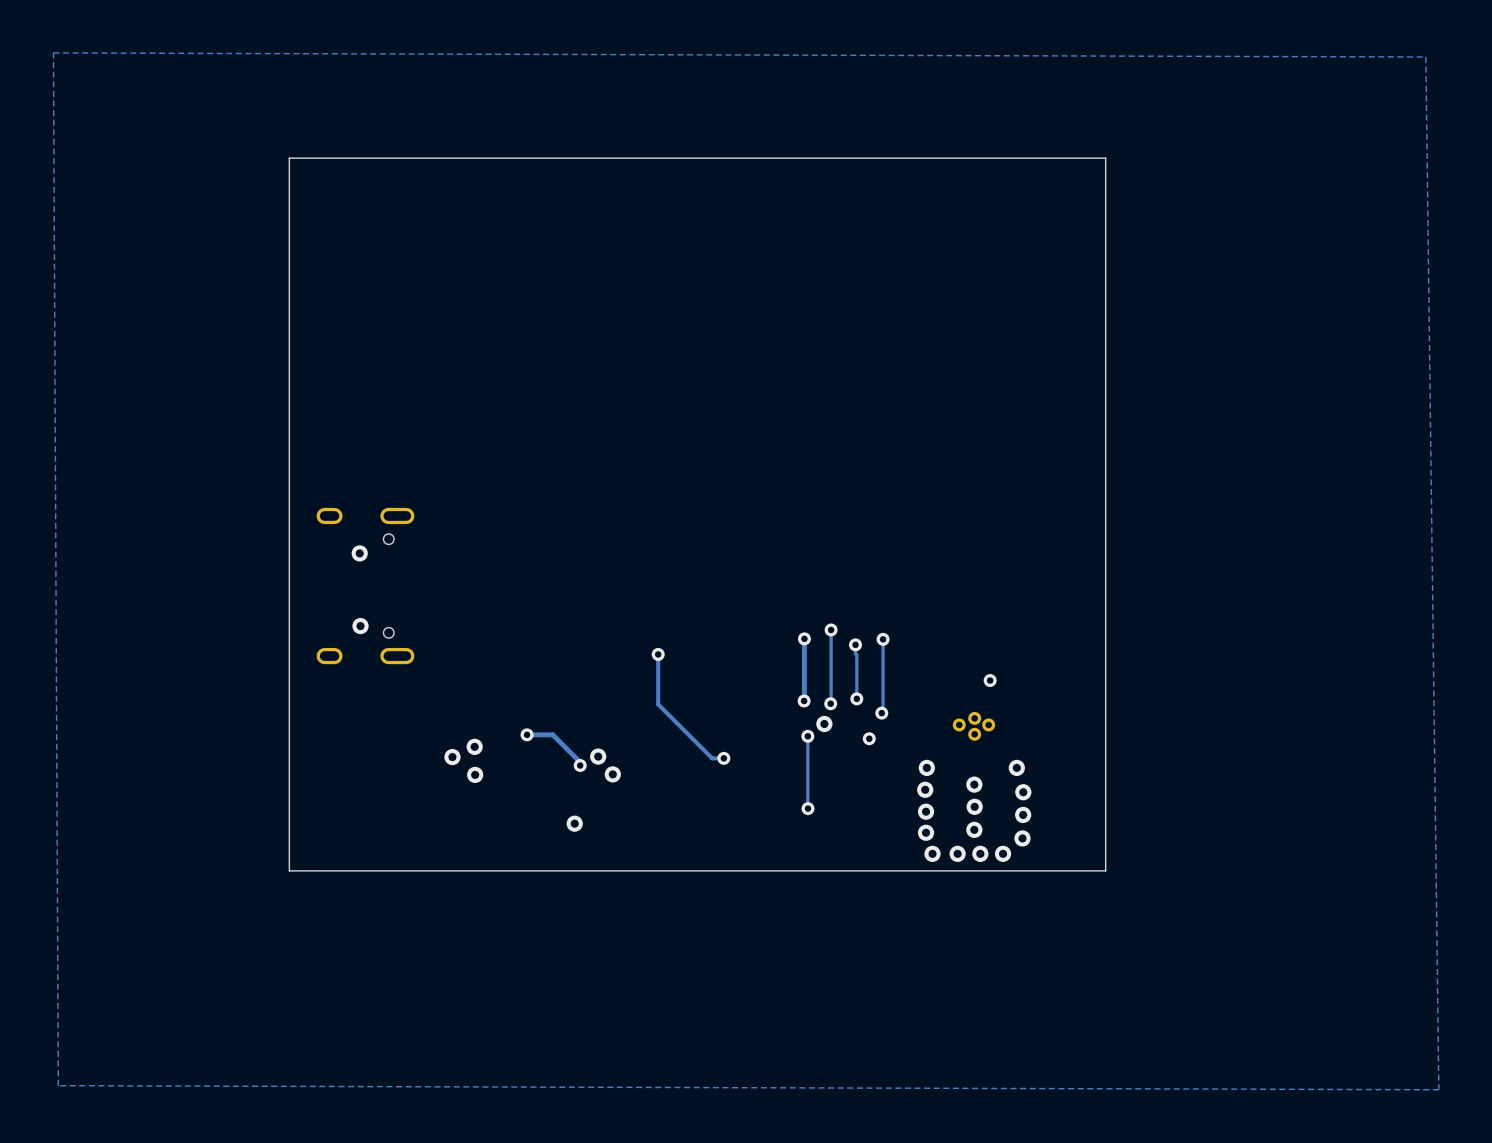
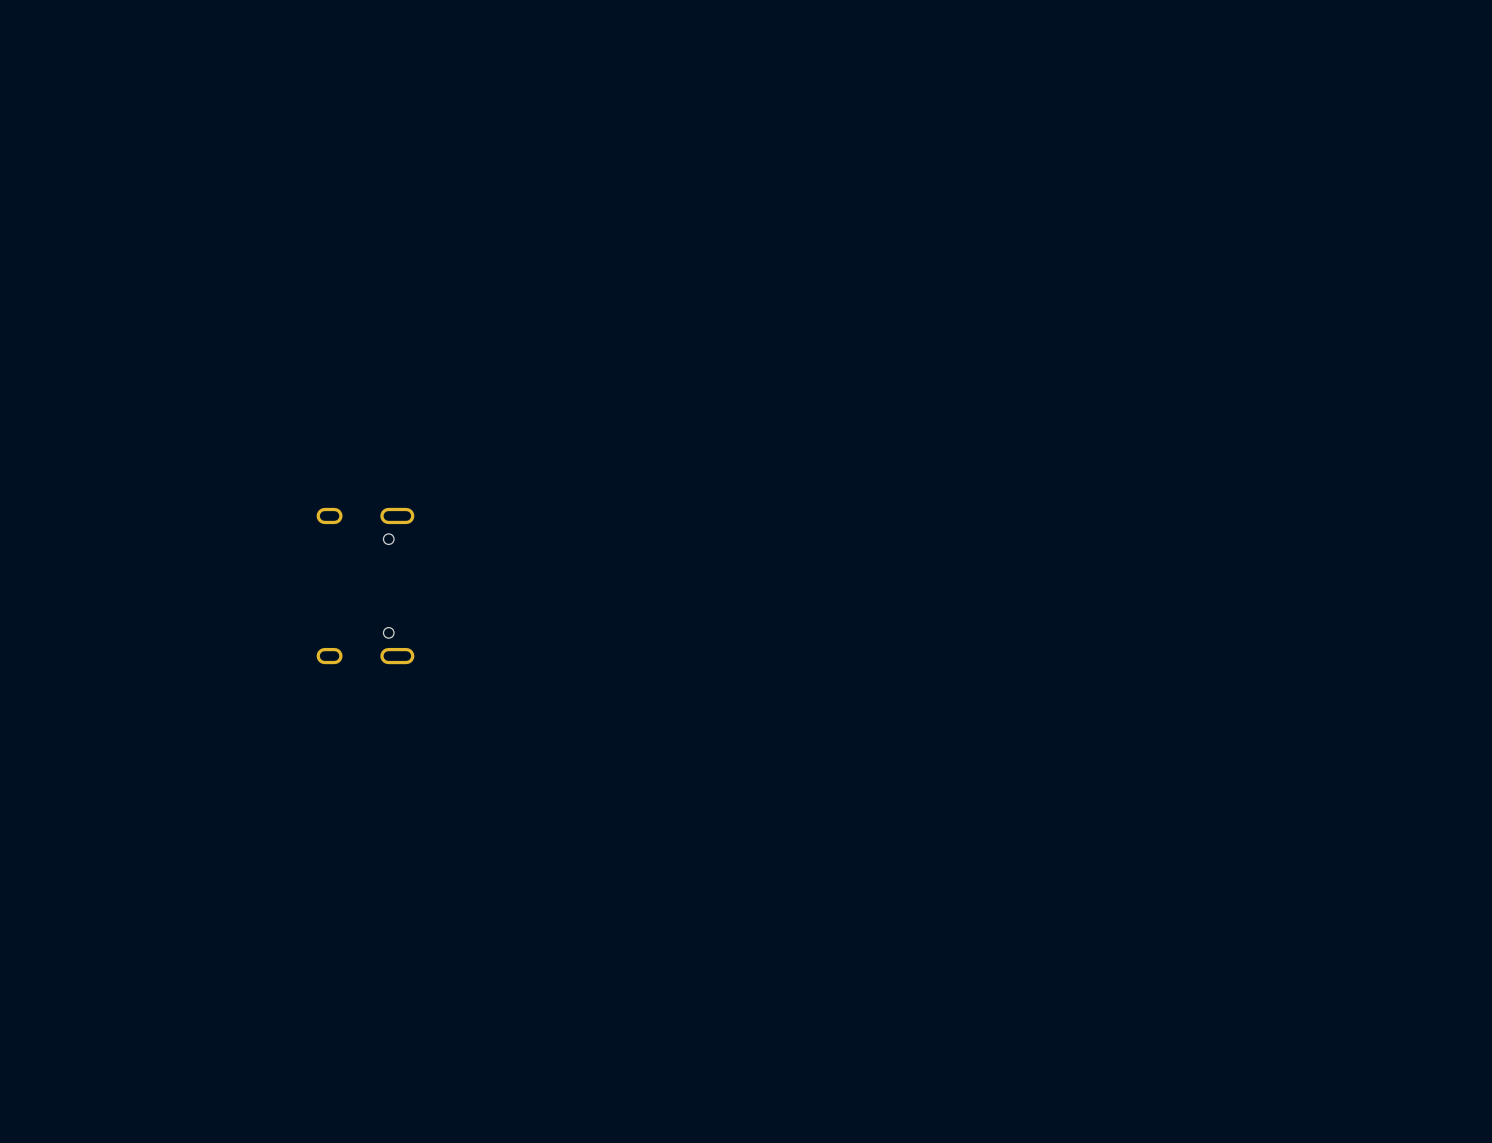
zone outline: (53, 52) (58, 1085) (1438, 1089) (1425, 57) (53, 52) -> none
board edge: (1105, 158) (289, 158) (289, 870) (1105, 870) (1105, 158) -> none
via: (359, 553) -> none
via: (360, 626) -> none
track: (831, 629) (830, 703) -> none
via: (831, 629) -> none
track: (804, 638) (804, 700) -> none
via: (804, 638) -> none
track: (883, 639) (883, 711) (881, 713) (879, 710) -> none
via: (883, 639) -> none
track: (855, 644) (856, 698) -> none
via: (855, 644) -> none
track: (658, 654) (658, 704) (712, 758) (723, 758) -> none
via: (658, 654) -> none
via: (990, 680) -> none
via: (856, 698) -> none
via: (804, 700) -> none
via: (830, 703) -> none
via: (881, 713) -> none
via: (824, 723) -> none
part: (973, 726) -> none
track: (527, 734) (552, 734) (580, 762) (580, 765) -> none
via: (527, 734) -> none
track: (807, 736) (807, 808) -> none
via: (807, 736) -> none
via: (869, 738) -> none
via: (474, 746) -> none
via: (598, 756) -> none
via: (452, 757) -> none
via: (723, 758) -> none
via: (580, 765) -> none
via: (926, 767) -> none
via: (1016, 767) -> none
via: (475, 774) -> none
via: (612, 774) -> none
via: (974, 784) -> none
via: (925, 789) -> none
via: (1023, 792) -> none
via: (974, 806) -> none
via: (808, 808) -> none
via: (926, 811) -> none
via: (1023, 814) -> none
via: (574, 823) -> none
via: (974, 829) -> none
via: (926, 832) -> none
via: (1022, 838) -> none
via: (932, 853) -> none
via: (957, 853) -> none
via: (980, 853) -> none
via: (1003, 853) -> none

